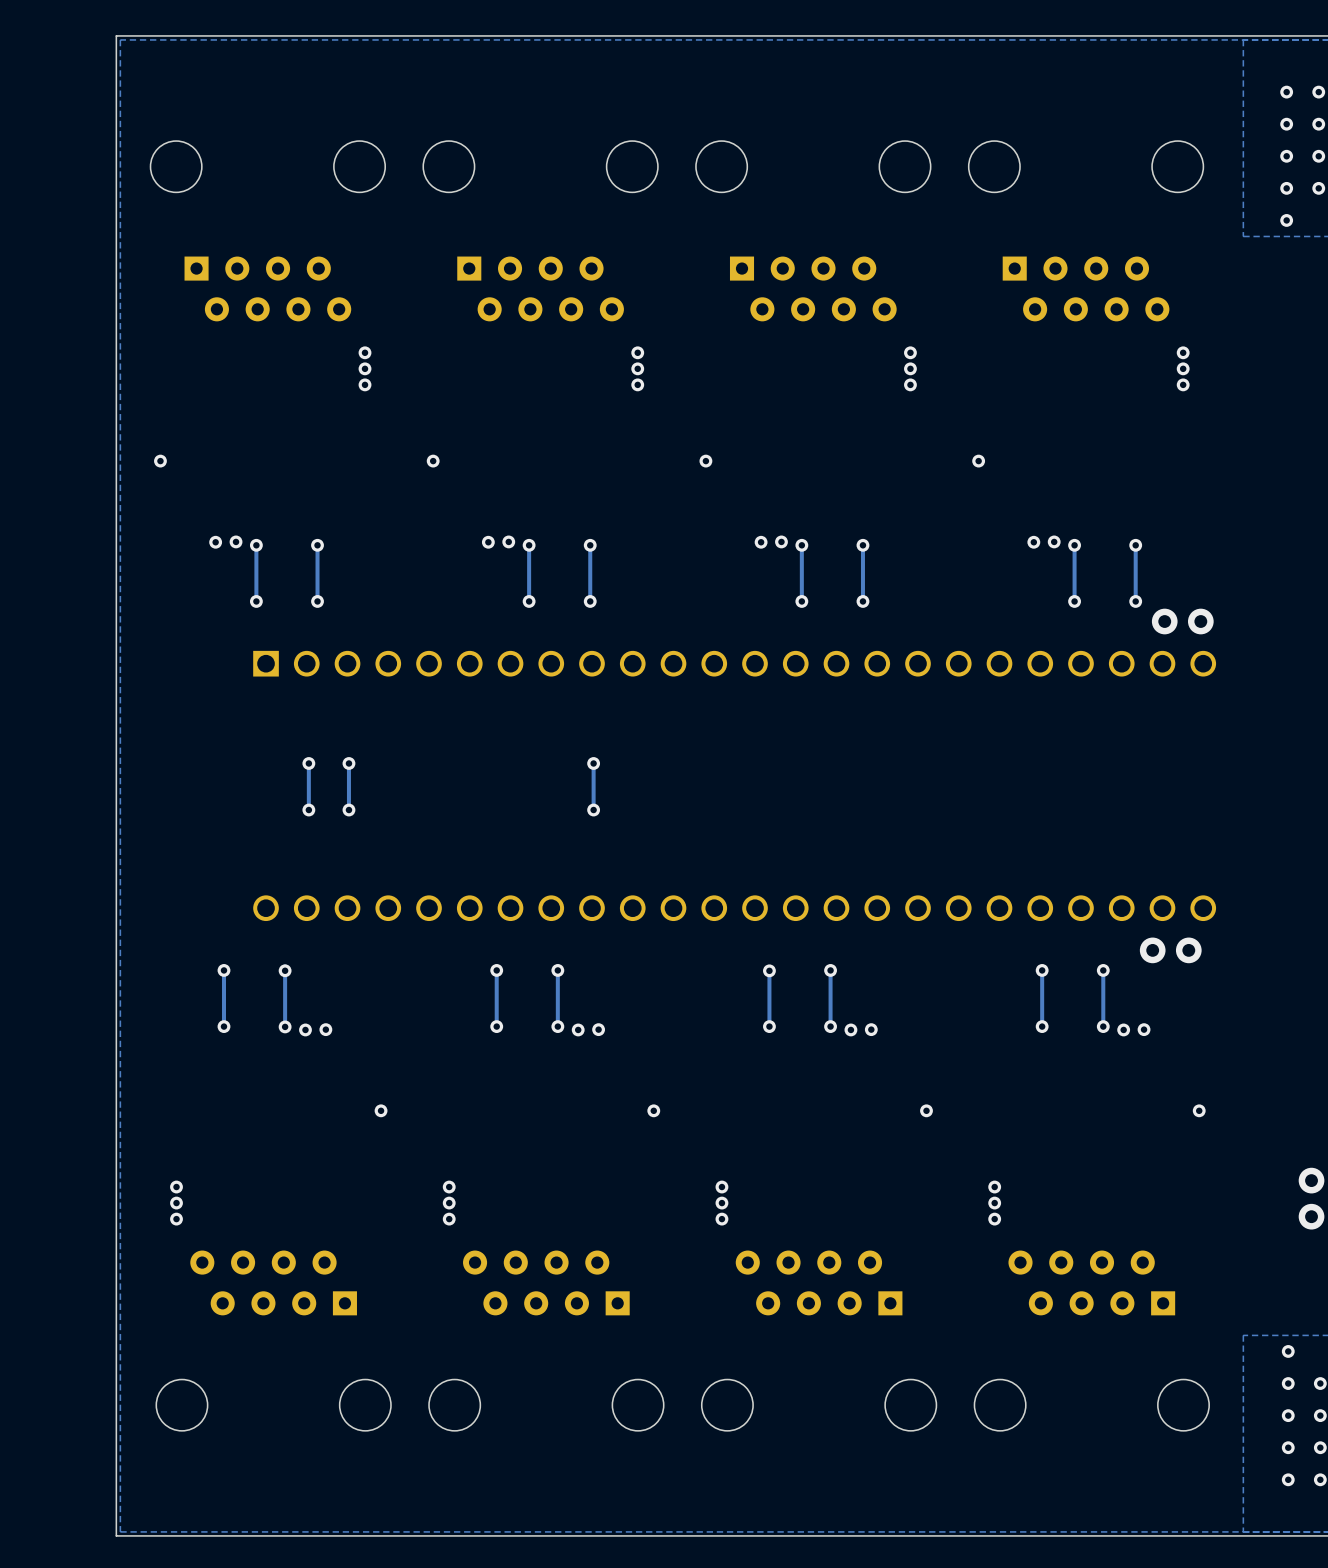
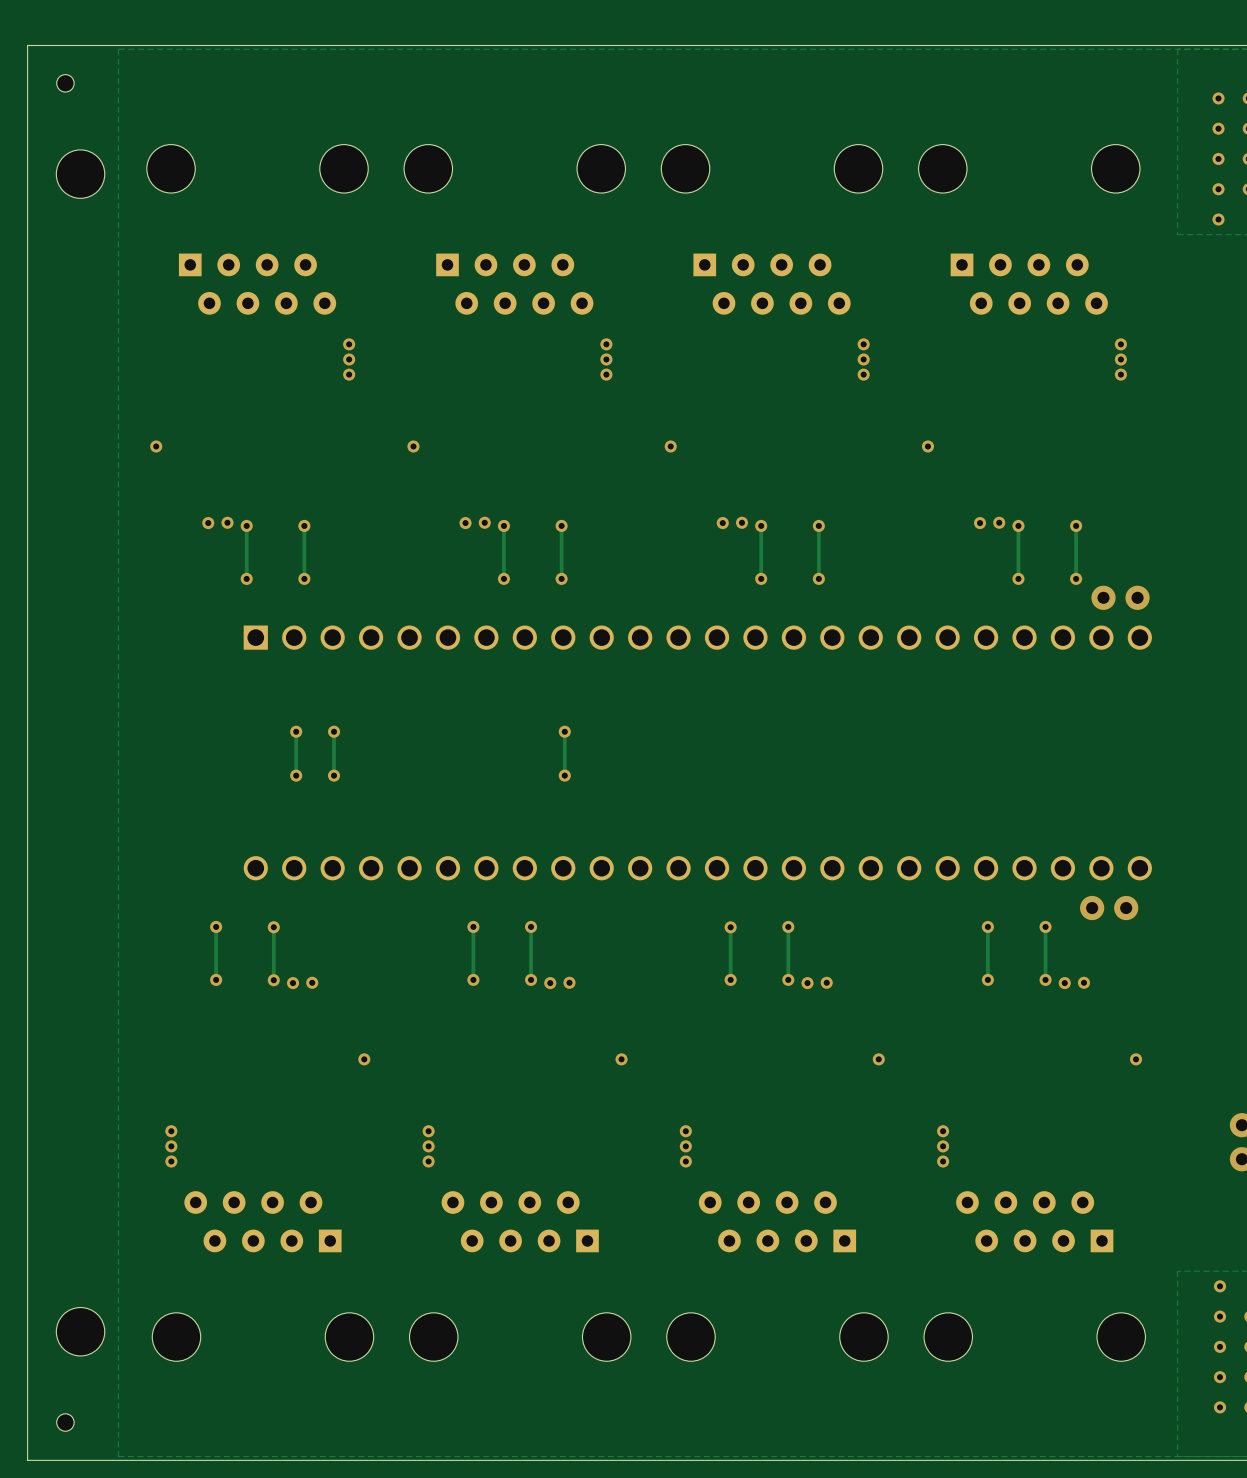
board edge: (116, 35) (116, 1535) -> (114, 45) (27, 45) (27, 1460) (114, 1460)
part: none -> (65, 83)
part: none -> (80, 174)
part: none -> (80, 1331)
part: none -> (65, 1422)

